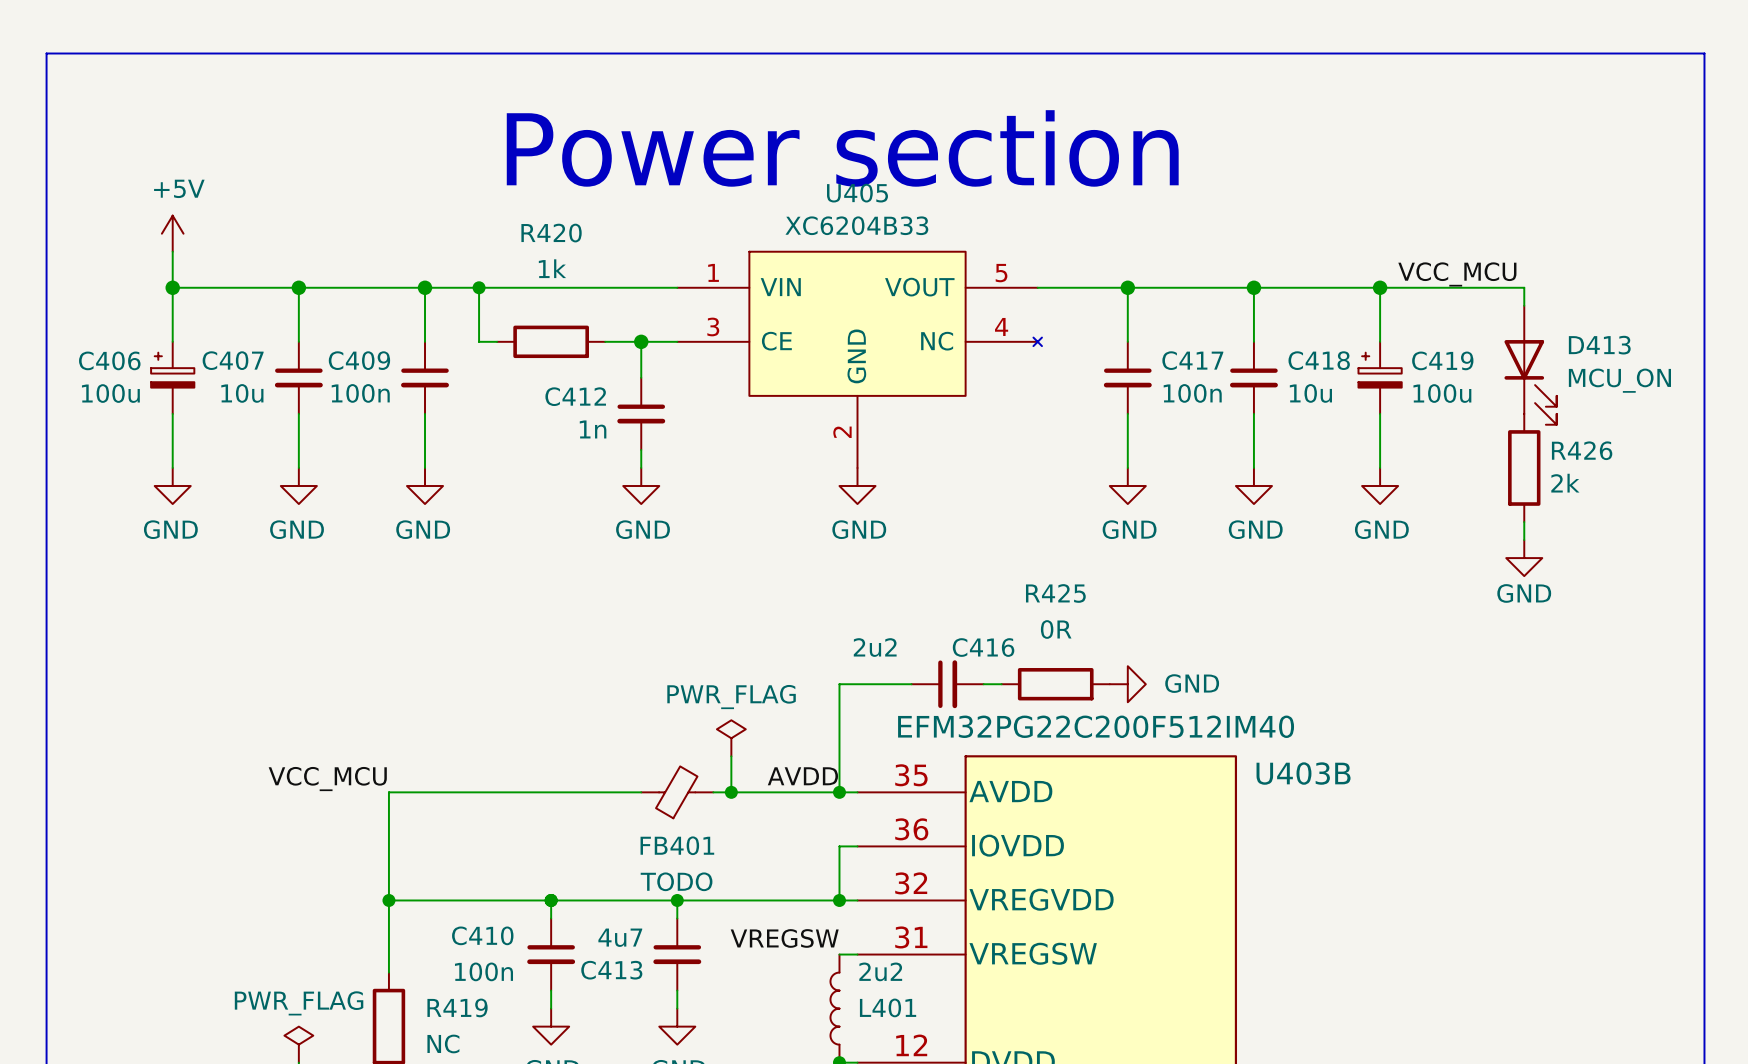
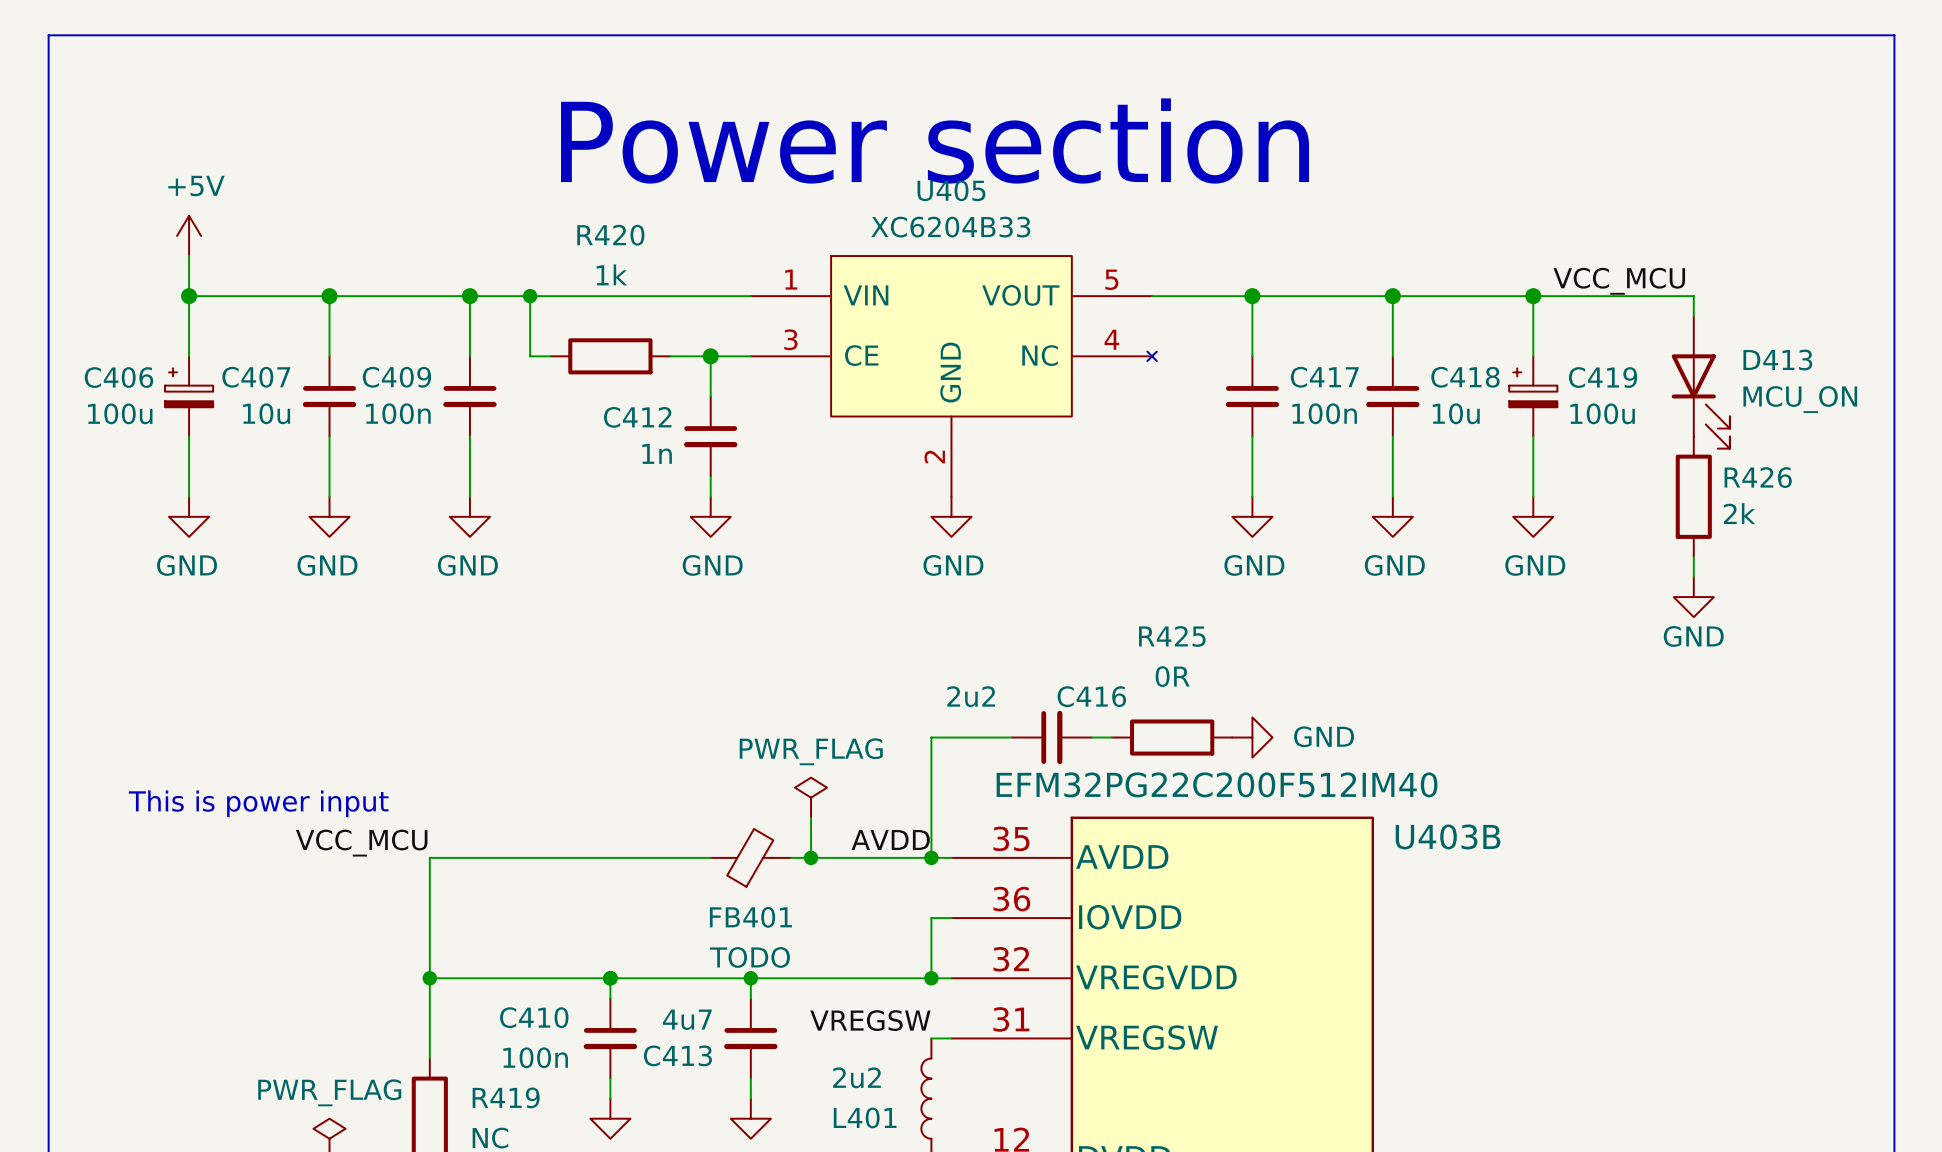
text: none -> This is power input (258, 803)
L401 value position: 2u2 (880, 971) -> 2u2 (856, 1077)
L401 name position: L401 (888, 1007) -> L401 (865, 1117)

